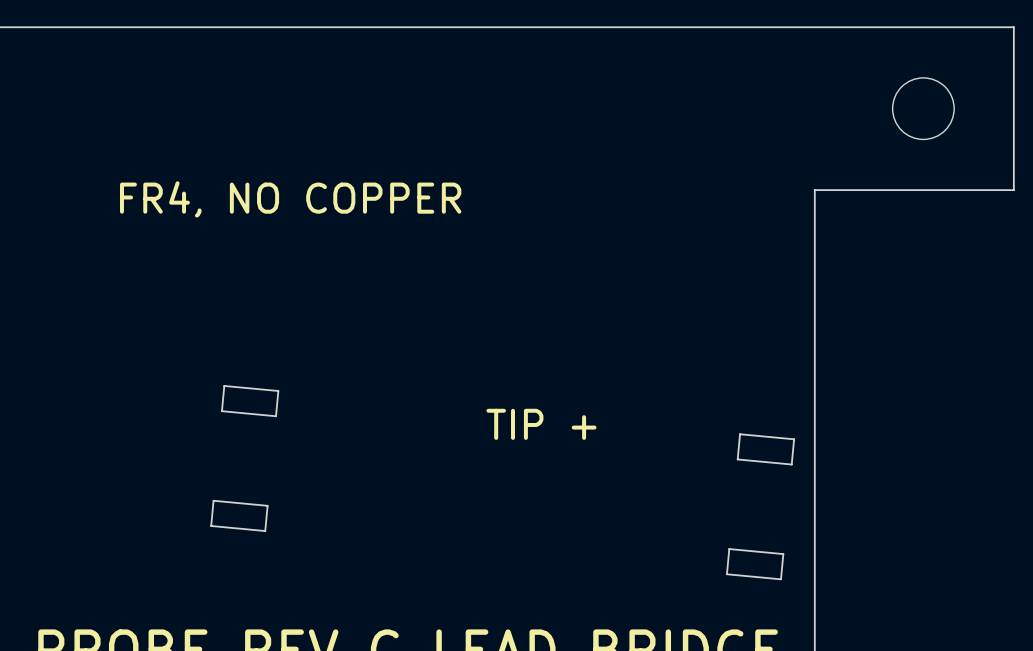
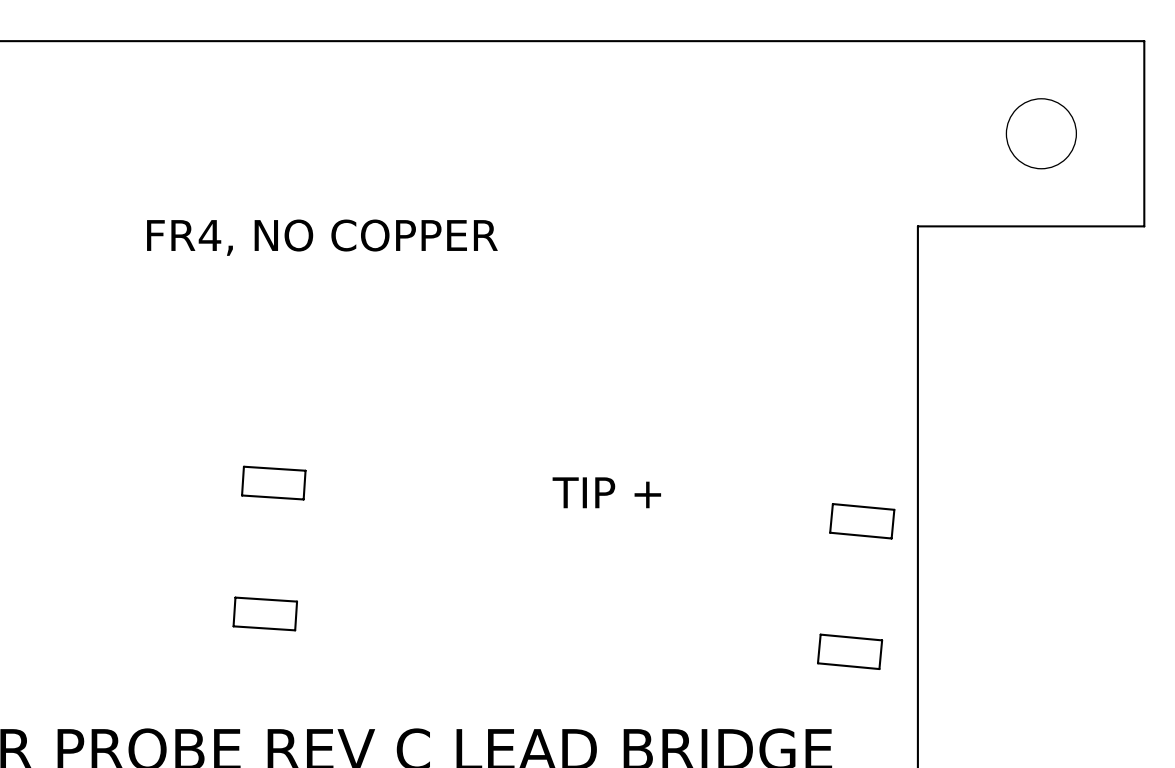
board edge: (224, 385) (278, 391) (276, 416) (221, 411) (224, 385) -> none
board edge: none -> (243, 466) (305, 470) (303, 499) (242, 495) (243, 466)
board edge: (213, 500) (211, 525) (265, 531) (267, 505) (213, 500) -> none
board edge: none -> (235, 597) (233, 626) (295, 630) (297, 601) (235, 597)

